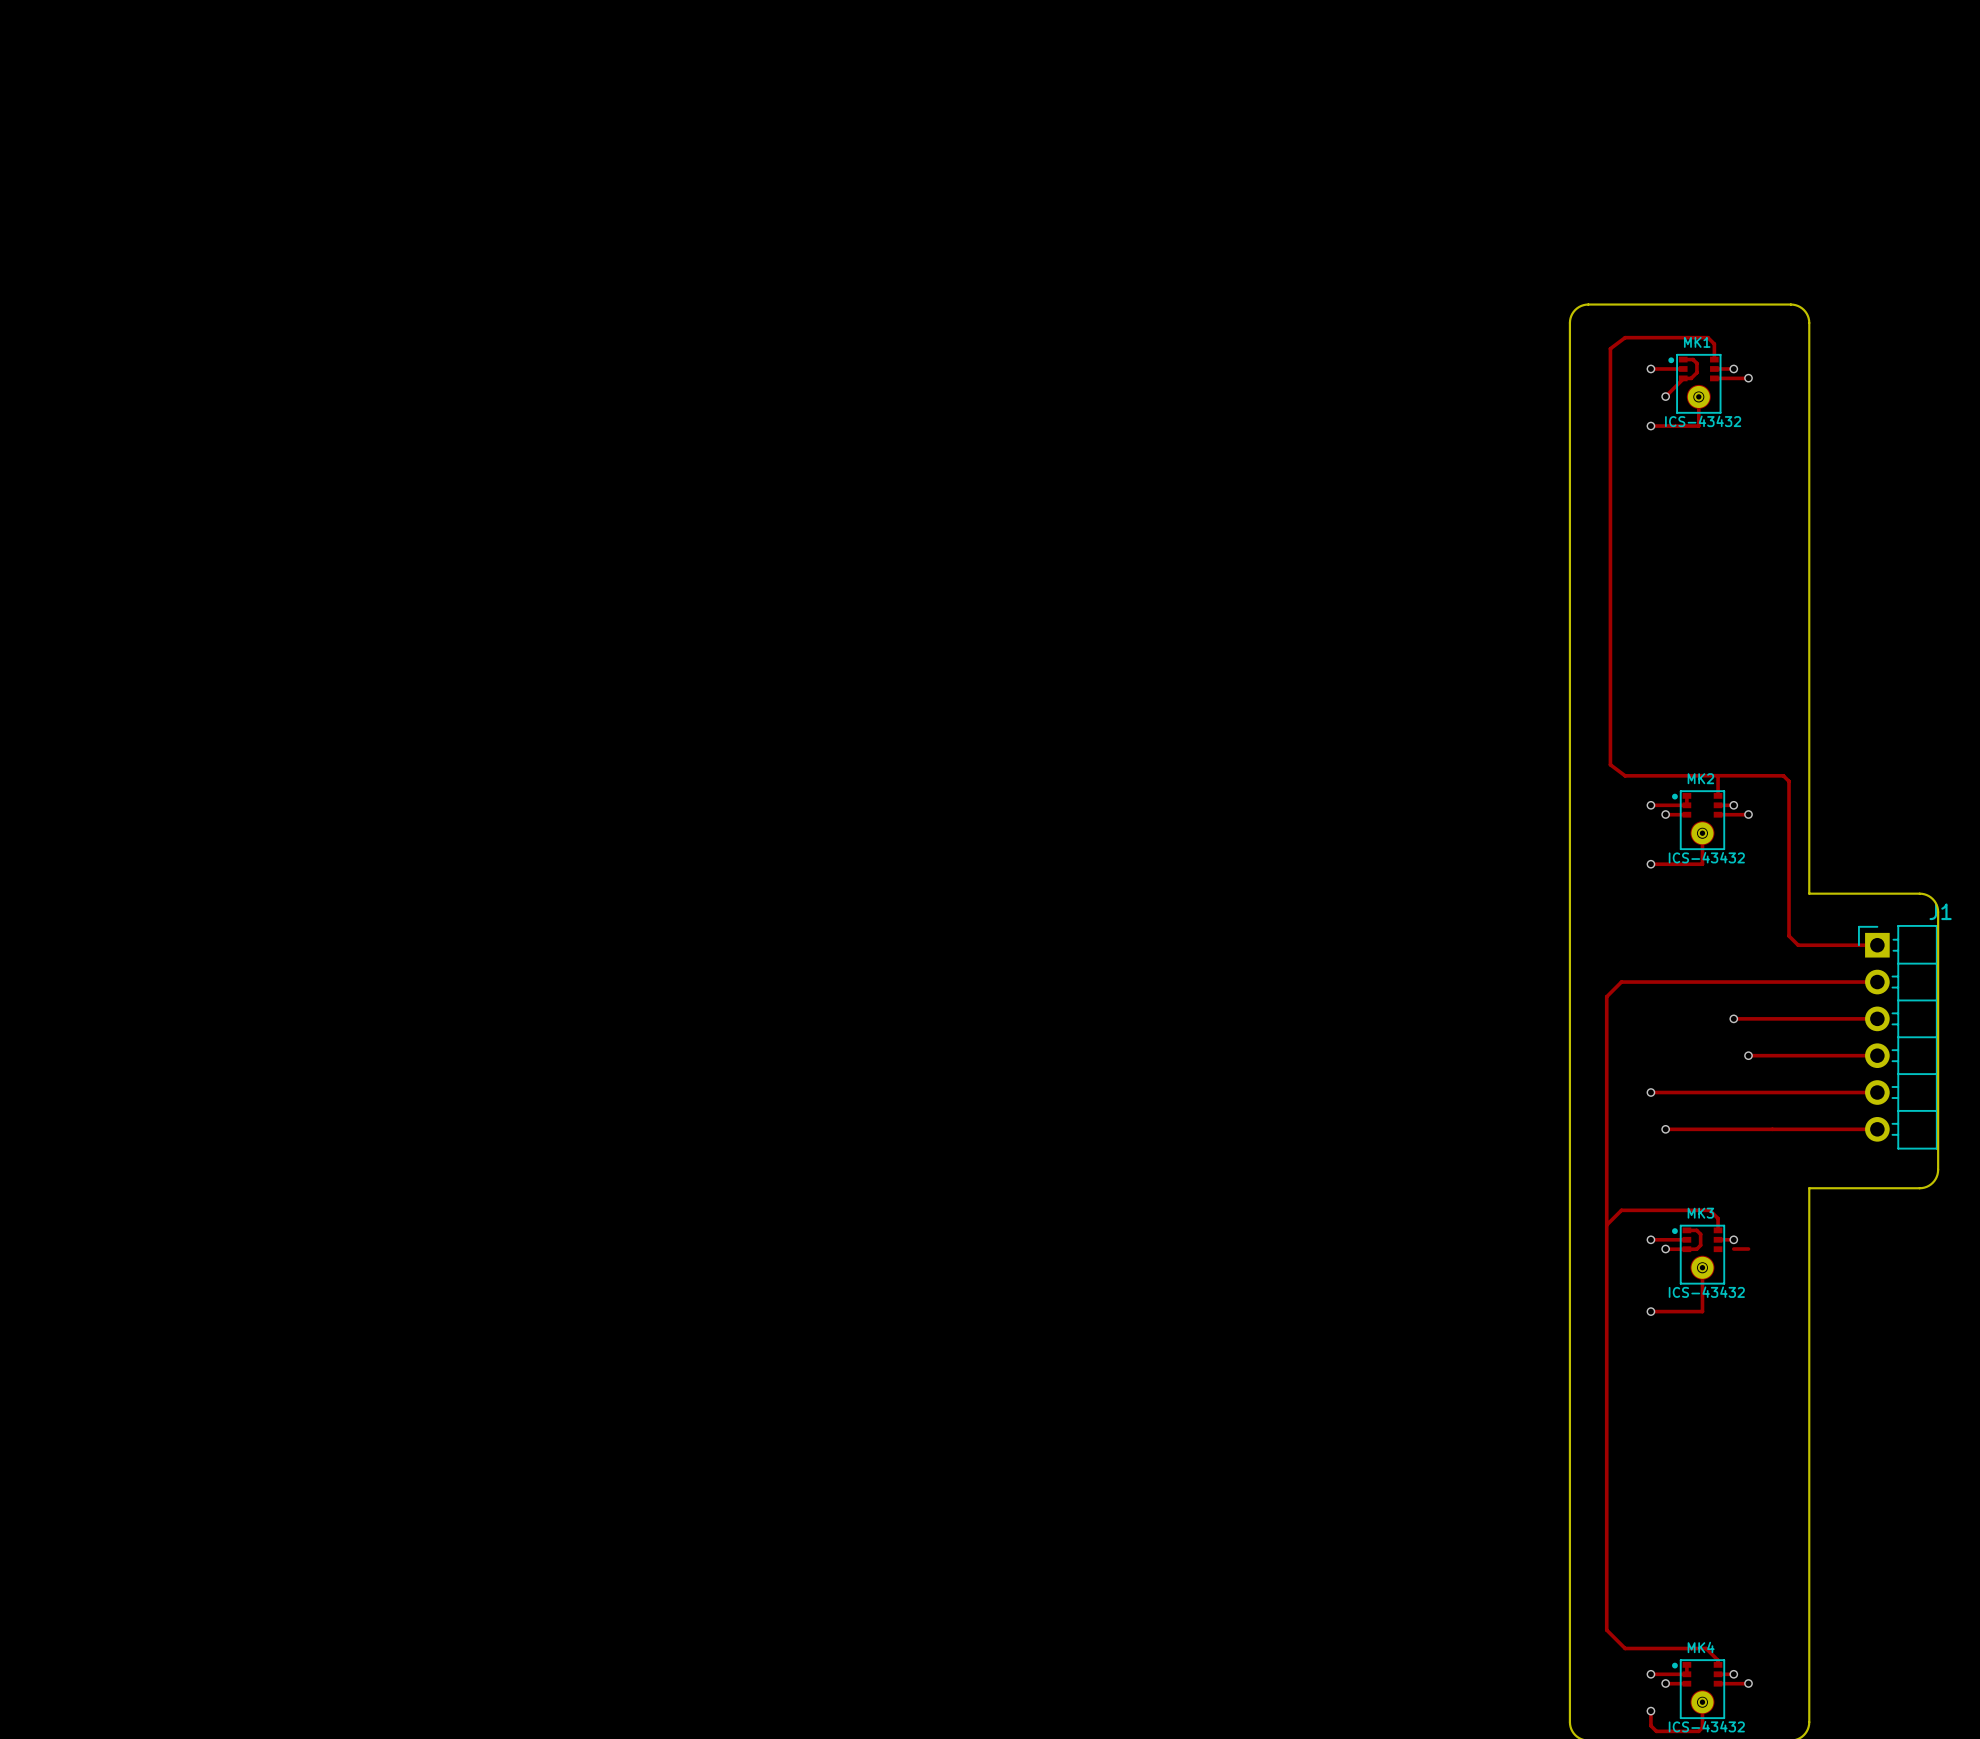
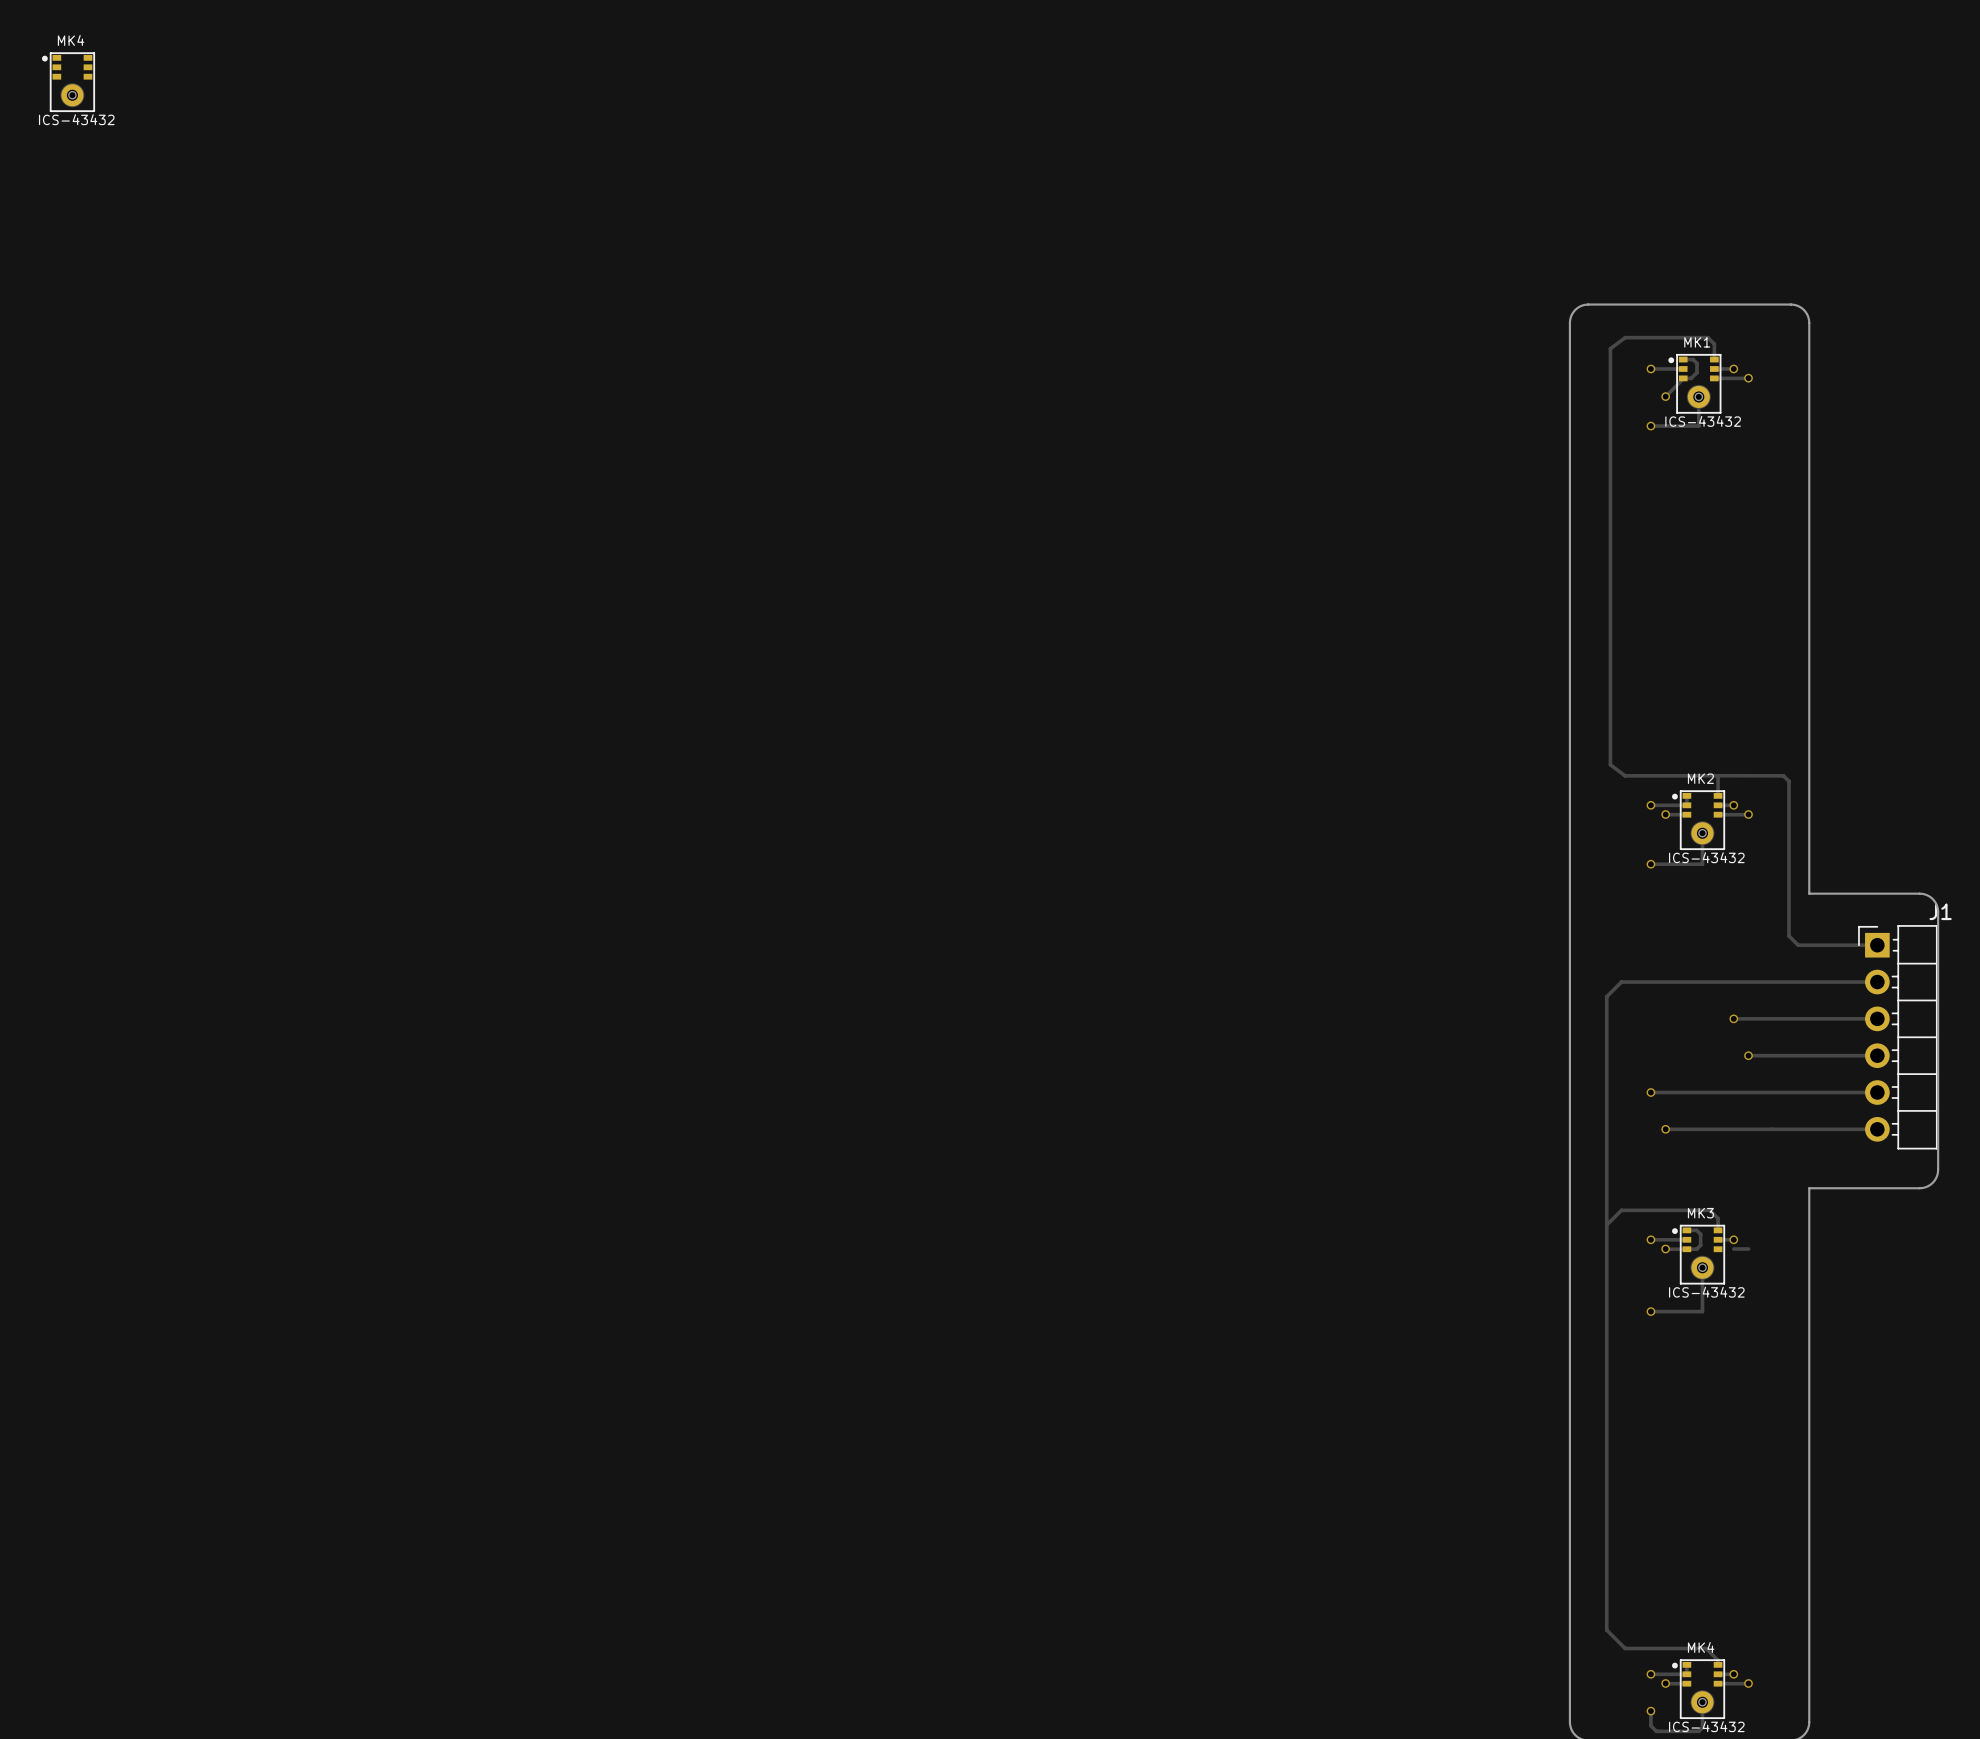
MK4: none -> ICS-43432 (68, 82)

